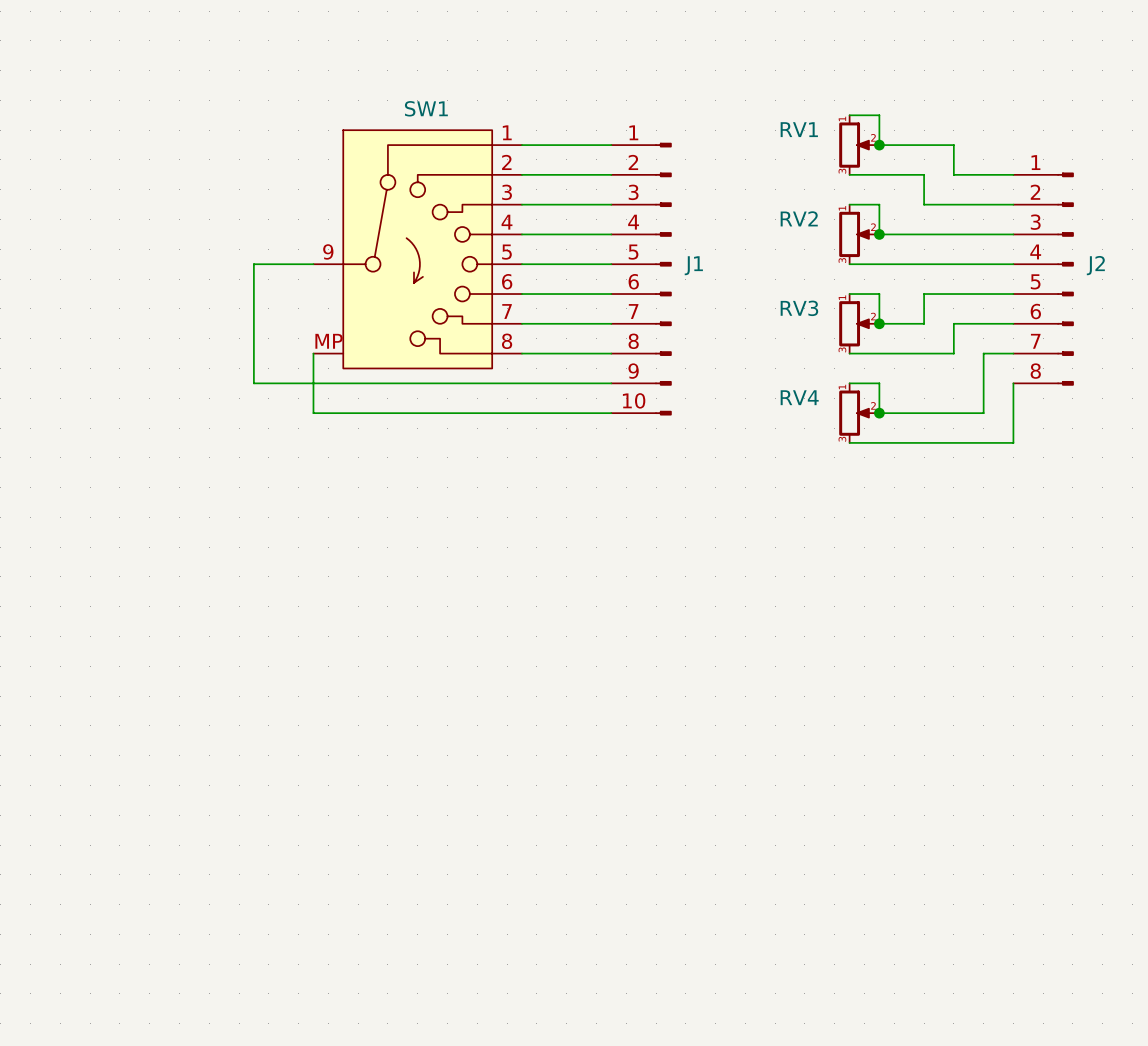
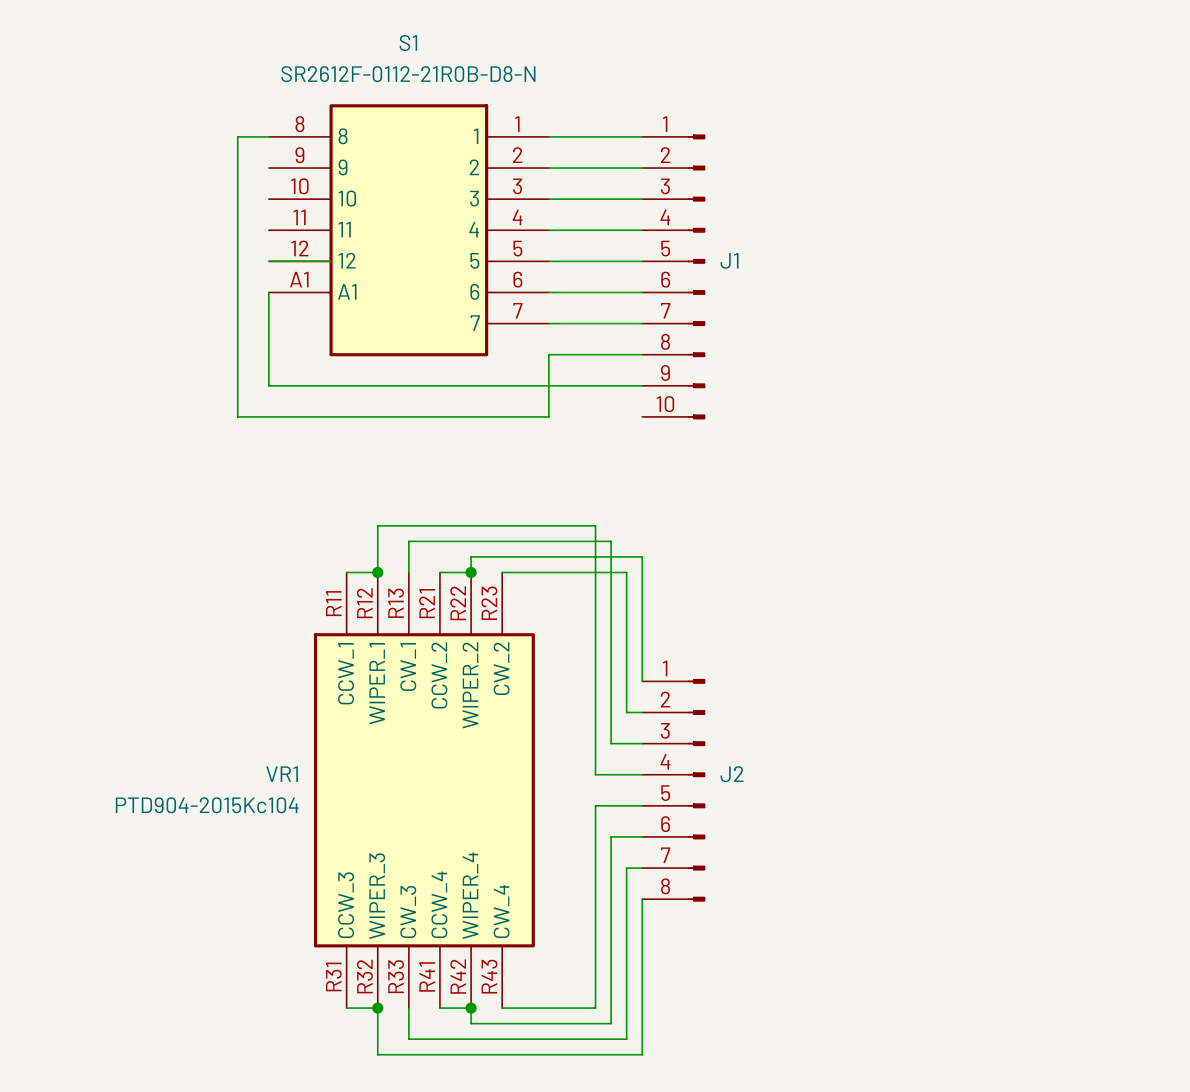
wire: (849, 115) (879, 115) (879, 145) (953, 145) (953, 174) (1013, 174) -> none
RV1: (859, 145) -> none
junction: (879, 145) -> none
wire: (849, 174) (924, 174) (924, 204) (1013, 204) -> none
wire: (849, 204) (879, 204) (879, 234) (1013, 234) -> none
S1: none -> SR2612F-0112-21R0B-D8-N (408, 230)
RV2: (859, 234) -> none
junction: (879, 234) -> none
SW1: (417, 249) -> none
wire: (253, 264) (253, 294) -> none
wire: (849, 264) (1013, 264) -> none
J2 position: (1043, 279) -> (673, 790)
wire: (849, 294) (879, 294) (879, 323) (924, 323) (924, 294) (1013, 294) -> none
RV3: (859, 323) -> none
junction: (879, 323) -> none
wire: (1013, 323) (953, 323) (953, 353) (849, 353) -> none
wire: (313, 353) (313, 413) -> (268, 136) (237, 136) (237, 416) (331, 416)
wire: (1013, 353) (983, 353) (983, 413) (879, 413) (879, 383) (849, 383) -> none
wire: (1013, 383) (1013, 442) (849, 442) -> none
wire: (521, 413) (611, 413) -> (548, 416) (548, 354)
RV4: (859, 413) -> none
junction: (879, 413) -> none
wire: none -> (346, 572) (377, 572) (377, 525) (595, 525) (595, 774) (642, 774)
junction: none -> (377, 572)
wire: none -> (408, 572) (408, 541) (611, 541) (611, 743) (642, 743)
wire: none -> (439, 572) (471, 572) (471, 556) (642, 556) (642, 681)
junction: none -> (471, 572)
wire: none -> (502, 572) (626, 572) (626, 712) (642, 712)
VR1: none -> PTD904-2015Kc104 (424, 790)
wire: none -> (642, 805) (595, 805) (595, 1008) (502, 1008)
wire: none -> (642, 836) (611, 836) (611, 1023) (471, 1023) (471, 1008) (439, 1008)
wire: none -> (642, 868) (626, 868) (626, 1039) (408, 1039) (408, 1008)
wire: none -> (642, 899) (642, 1054) (377, 1054) (377, 1008) (346, 1008)
junction: none -> (377, 1008)
junction: none -> (471, 1008)

